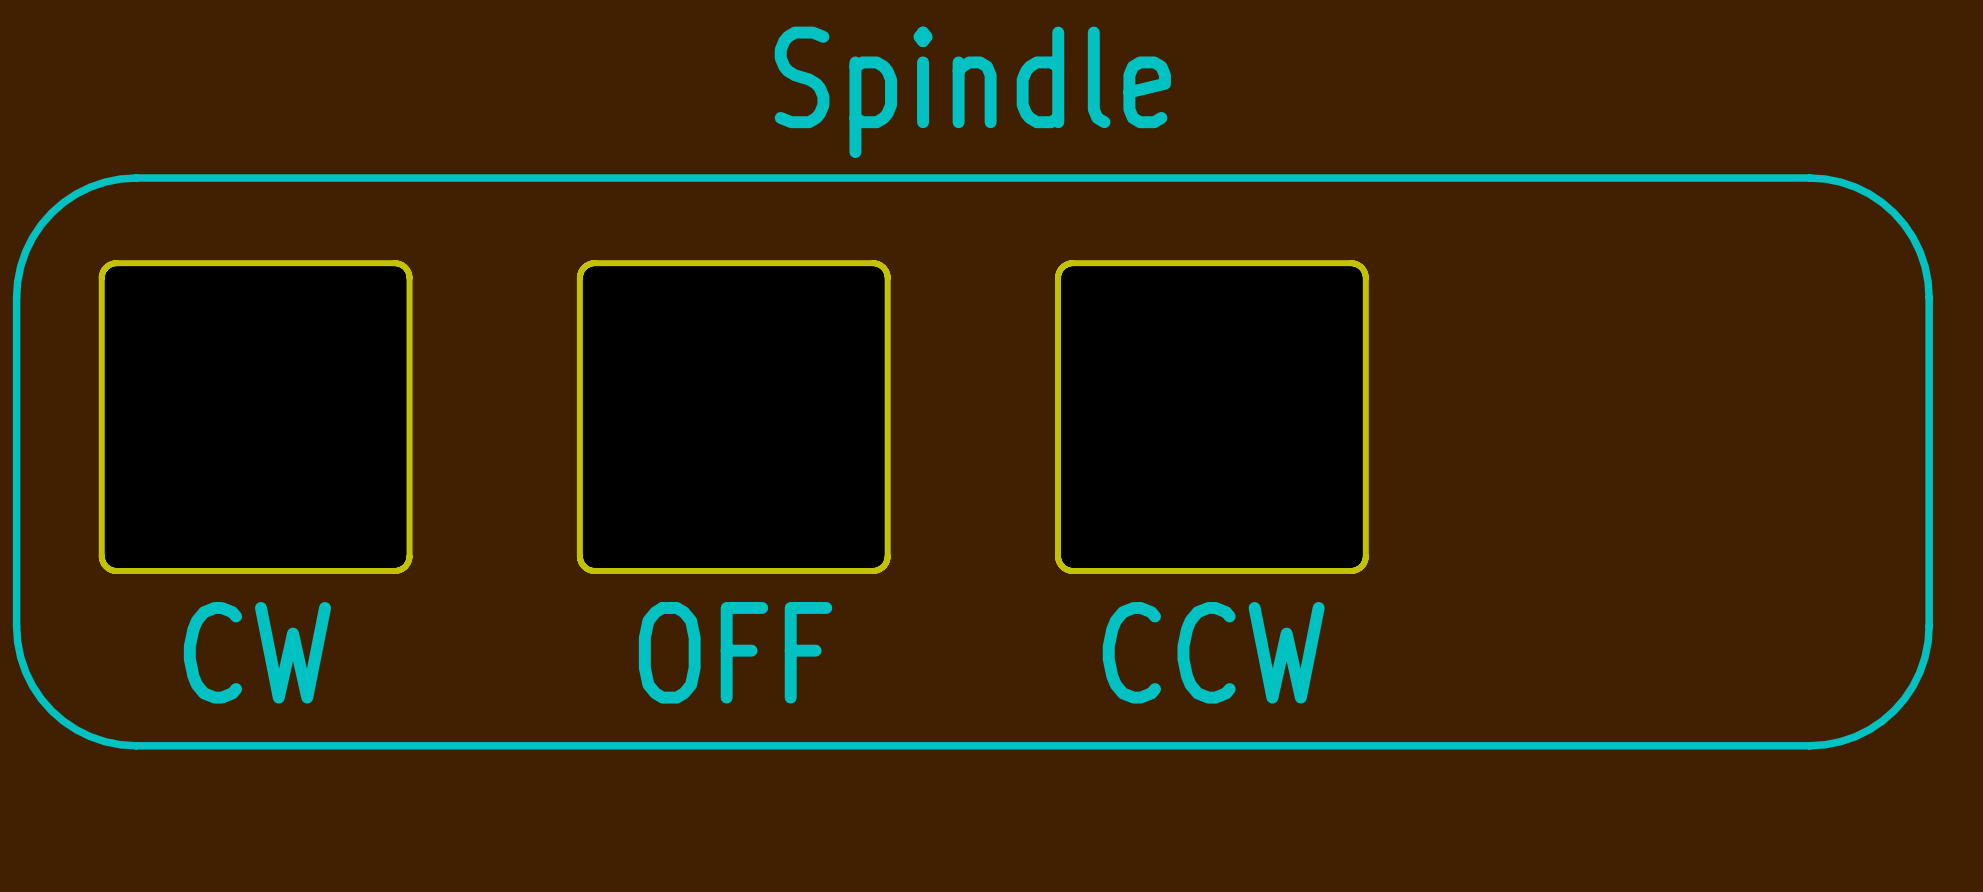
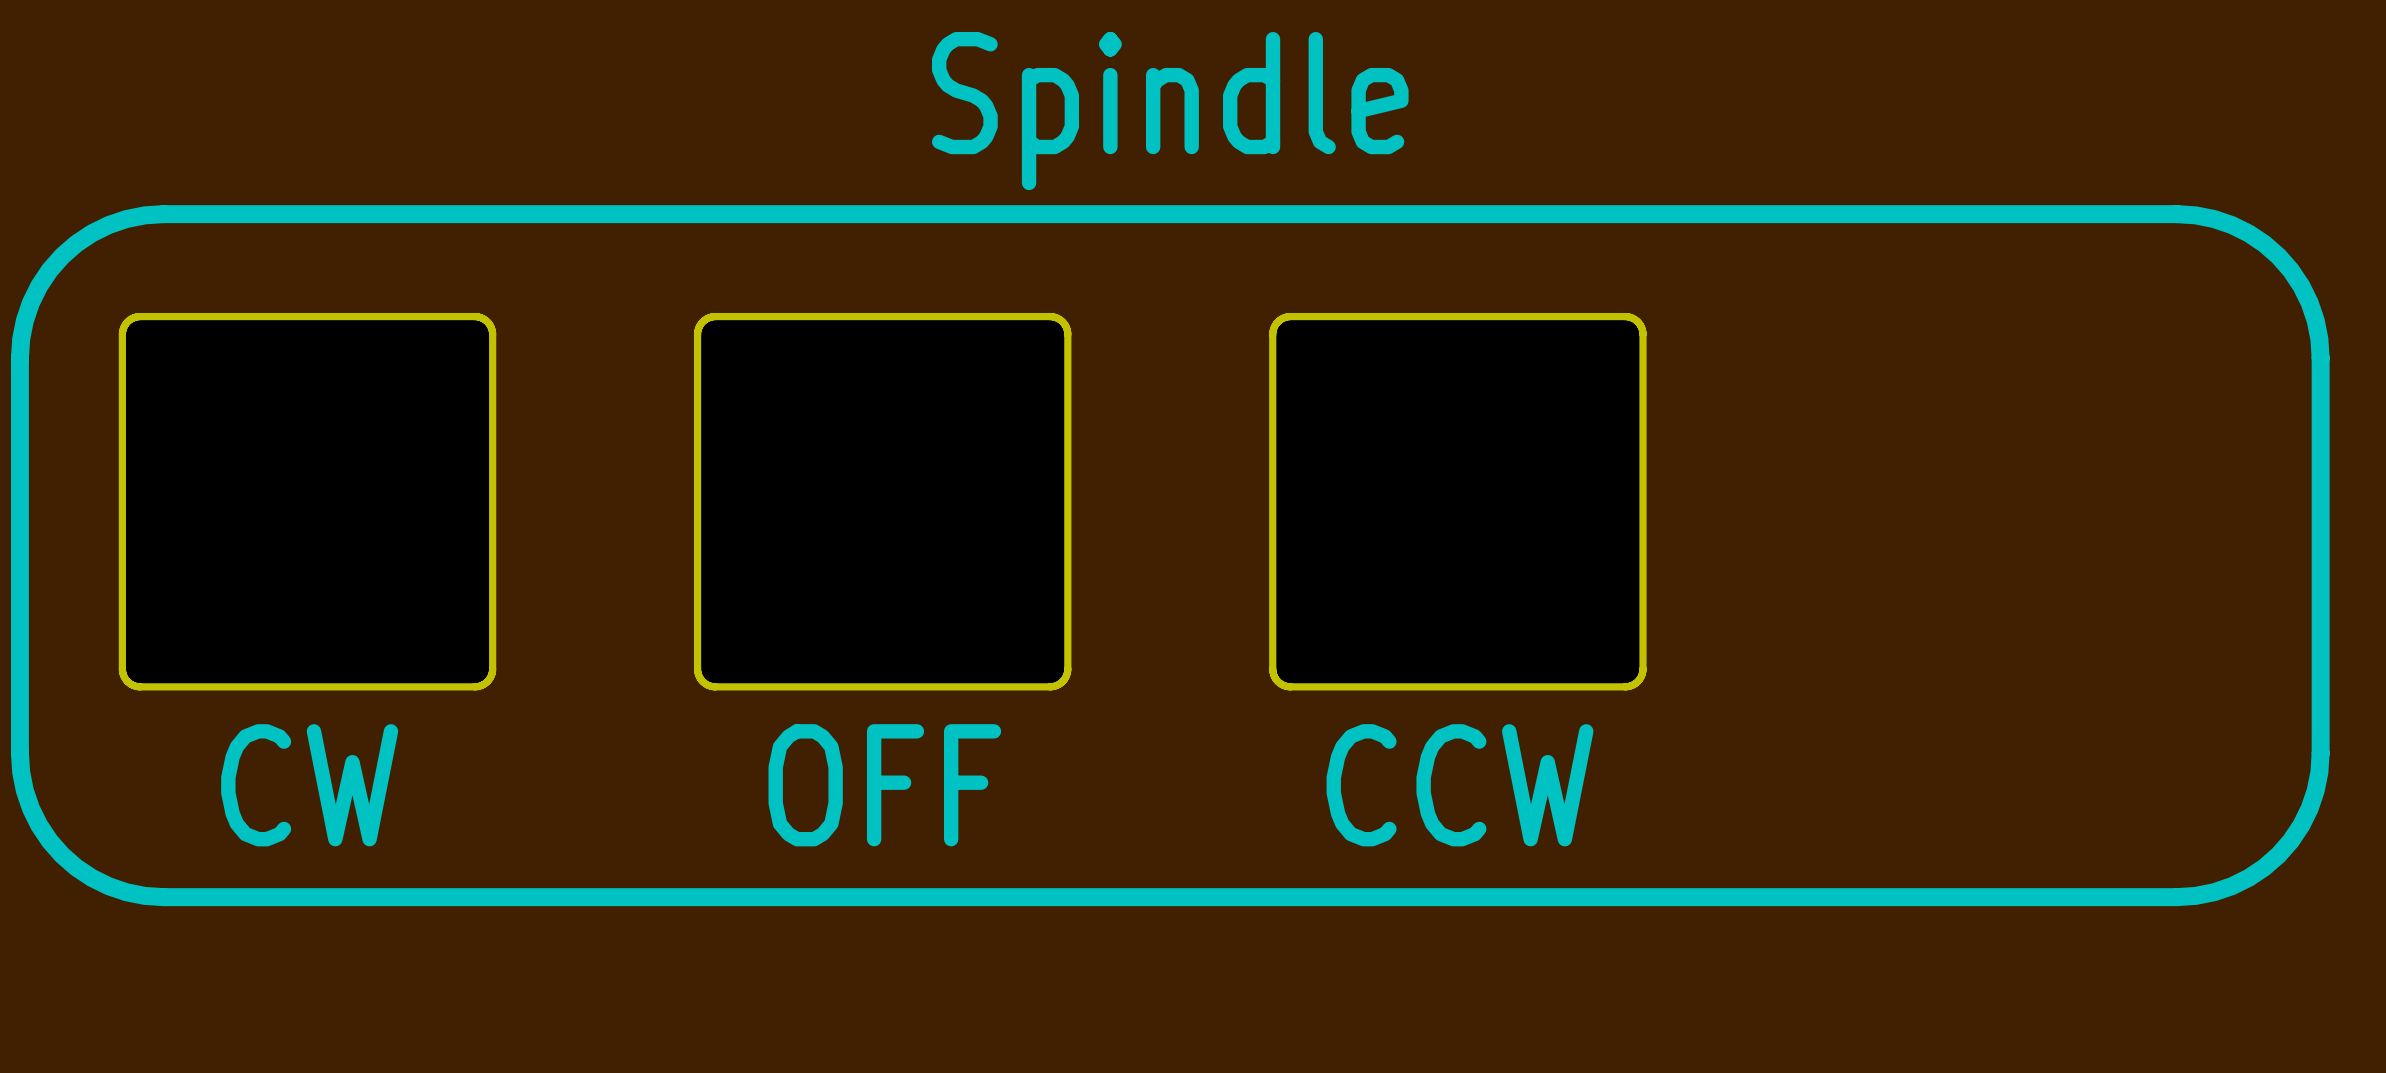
line width: thin (136, 178) (1809, 178) (1840, 182) (1869, 194) (1894, 213) (1913, 237) (1920, 251) (1928, 281) (1929, 626) (1925, 657) (1913, 686) (1894, 710) (1882, 721) (1855, 736) (1840, 741) (1809, 745) (136, 745) (105, 741) (76, 729) (51, 710) (32, 686) (20, 657) (16, 626) (16, 297) (20, 266) (25, 251) (32, 237) (51, 213) (76, 194) (90, 187) (120, 179) (136, 178) -> thick (163, 214) (2176, 214) (2214, 219) (2248, 233) (2278, 256) (2301, 286) (2309, 302) (2319, 339) (2320, 753) (2315, 790) (2301, 825) (2278, 855) (2264, 867) (2231, 886) (2214, 892) (2176, 897) (163, 897) (126, 892) (91, 877) (62, 855) (39, 825) (24, 790) (19, 753) (19, 357) (24, 320) (30, 302) (39, 286) (62, 256) (91, 233) (108, 225) (144, 215) (163, 214)

